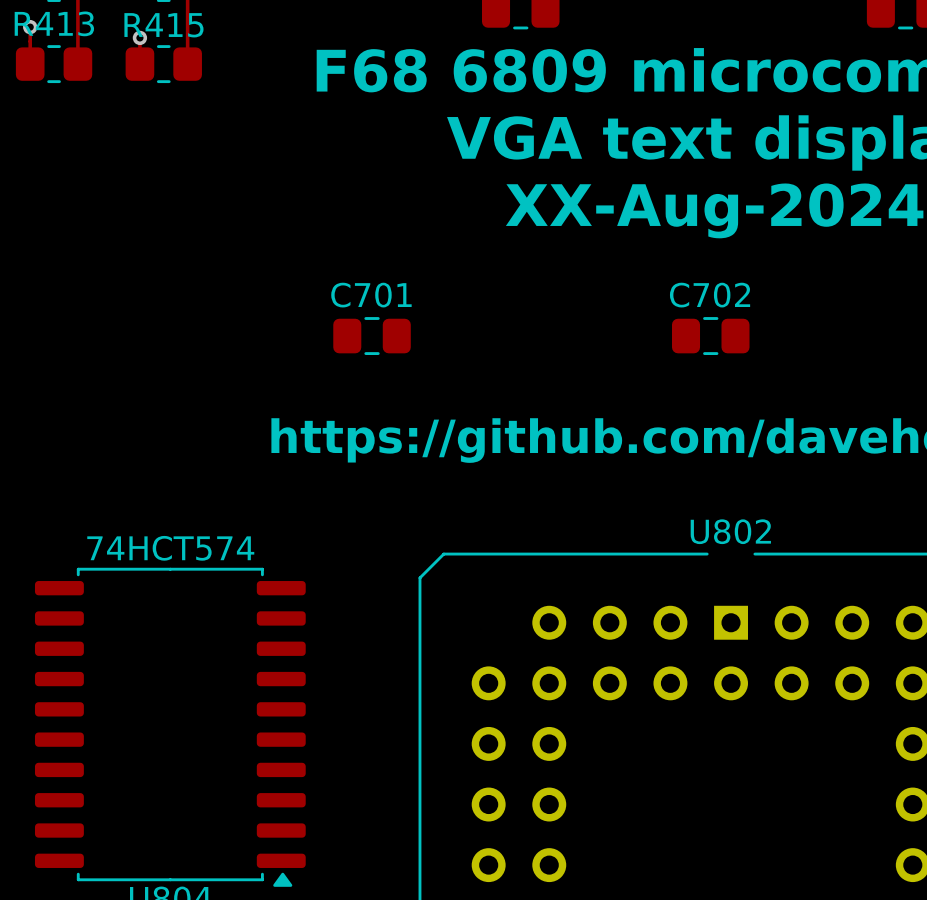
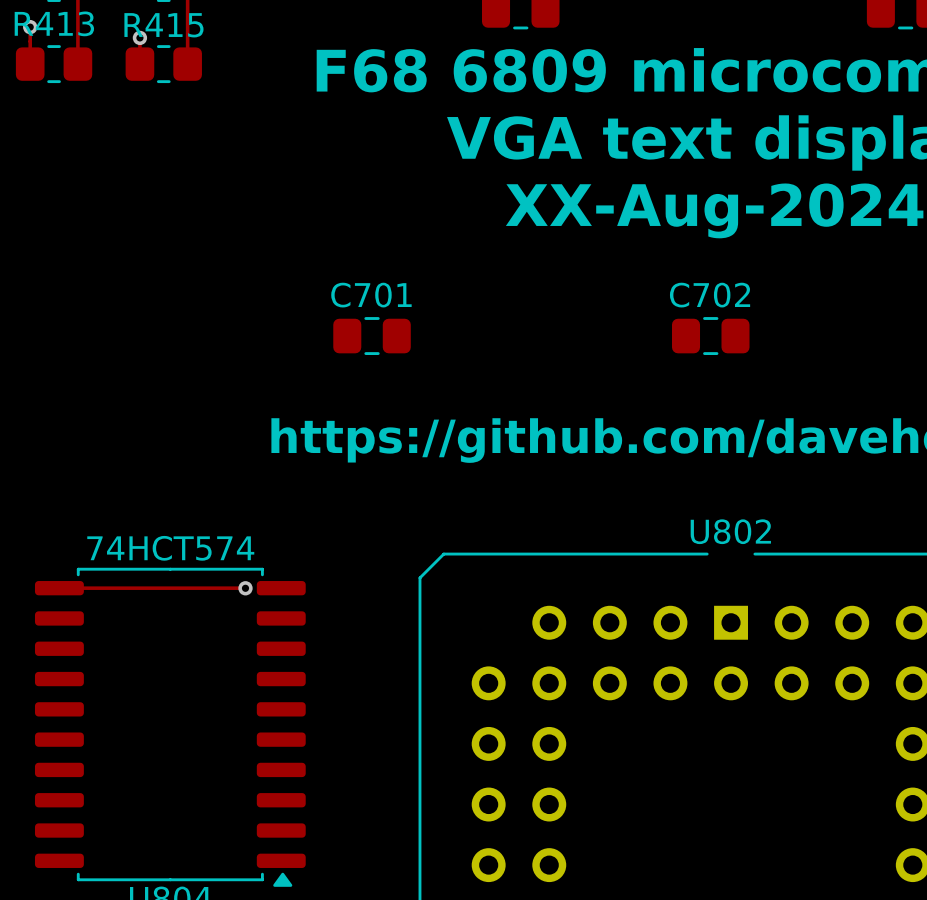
track: none -> (59, 588) (245, 588)
via: none -> (245, 588)

